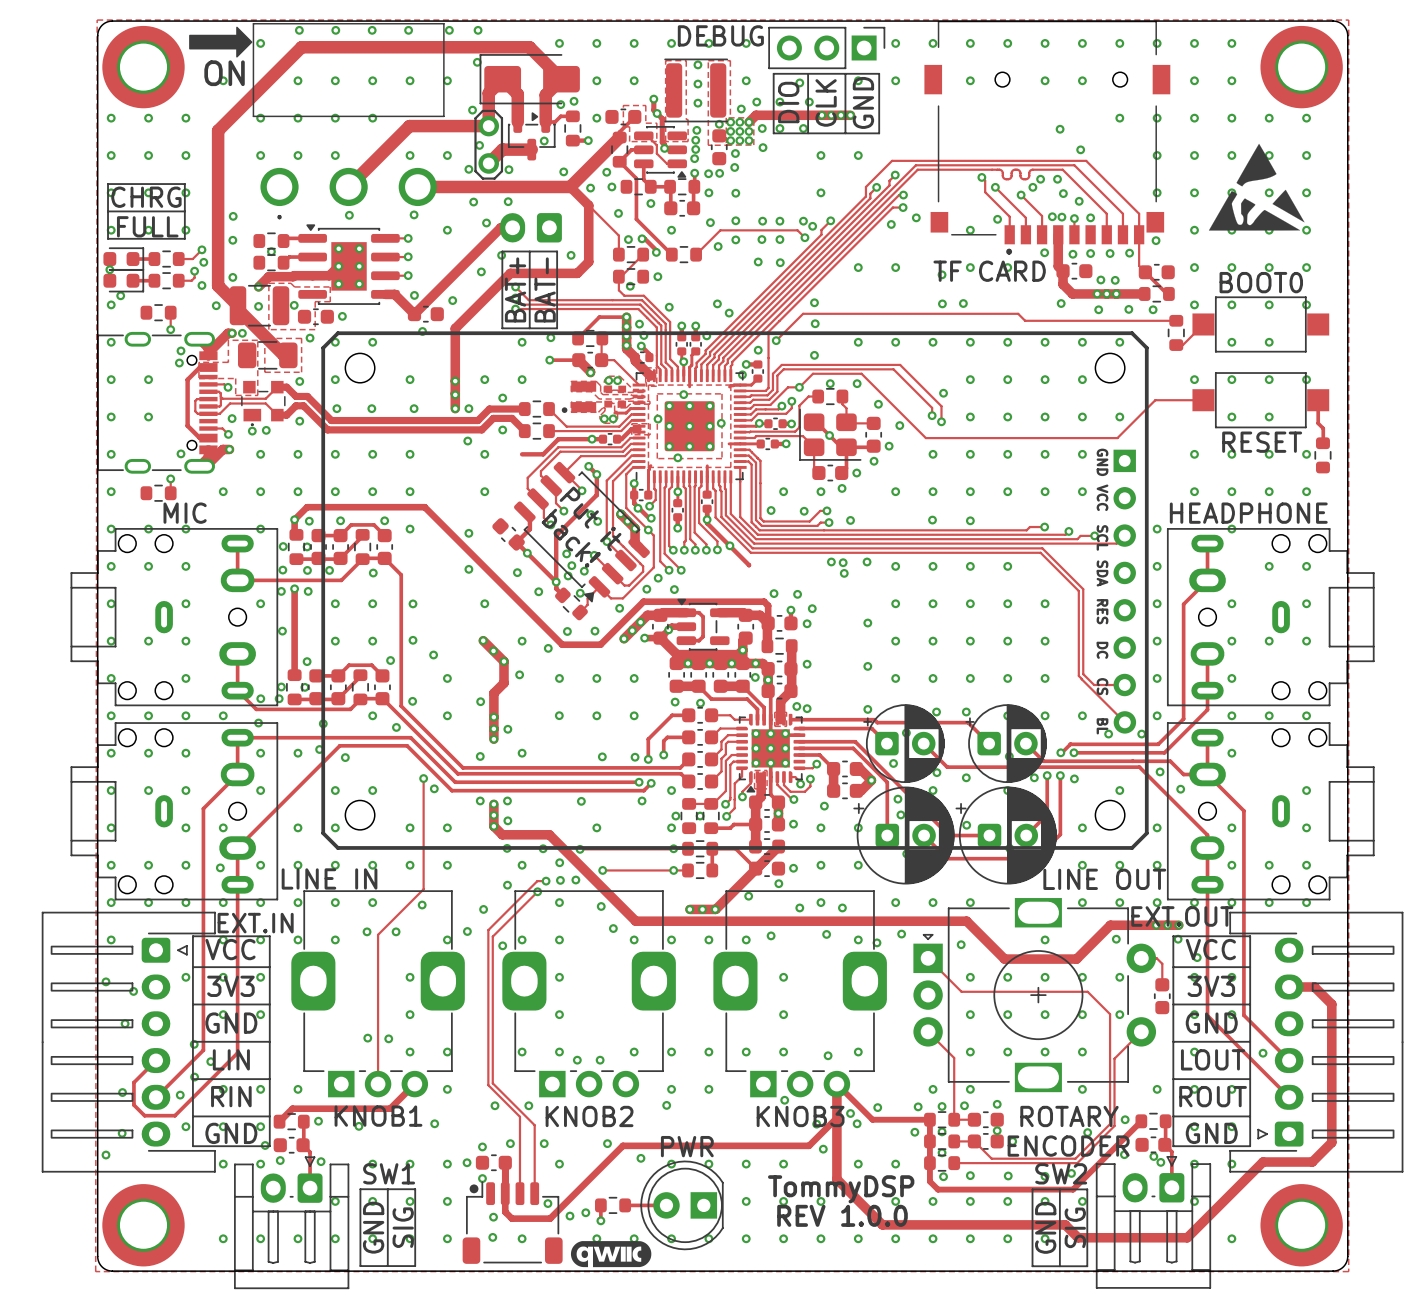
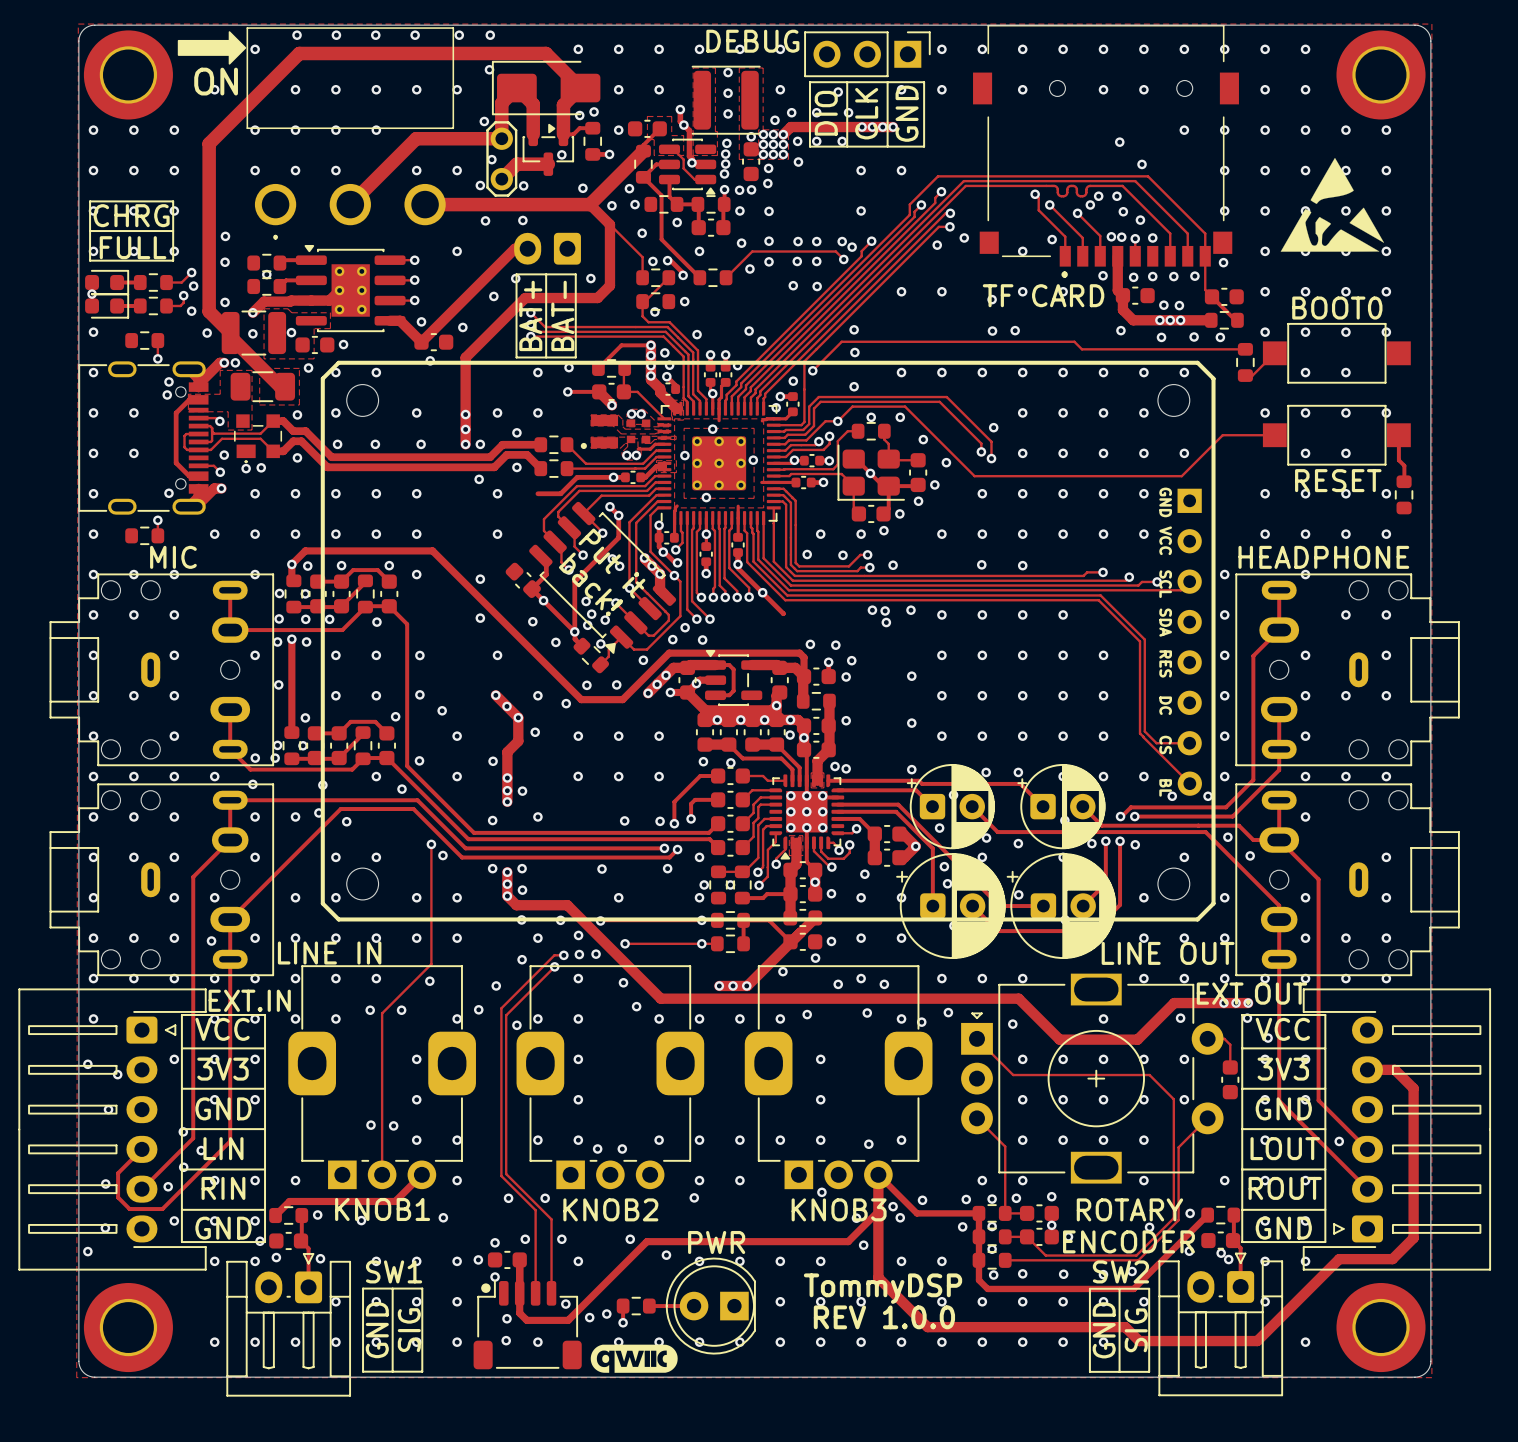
via: (414, 214) -> none
via: (349, 215) -> none
via: (486, 223) -> none
via: (120, 295) -> none

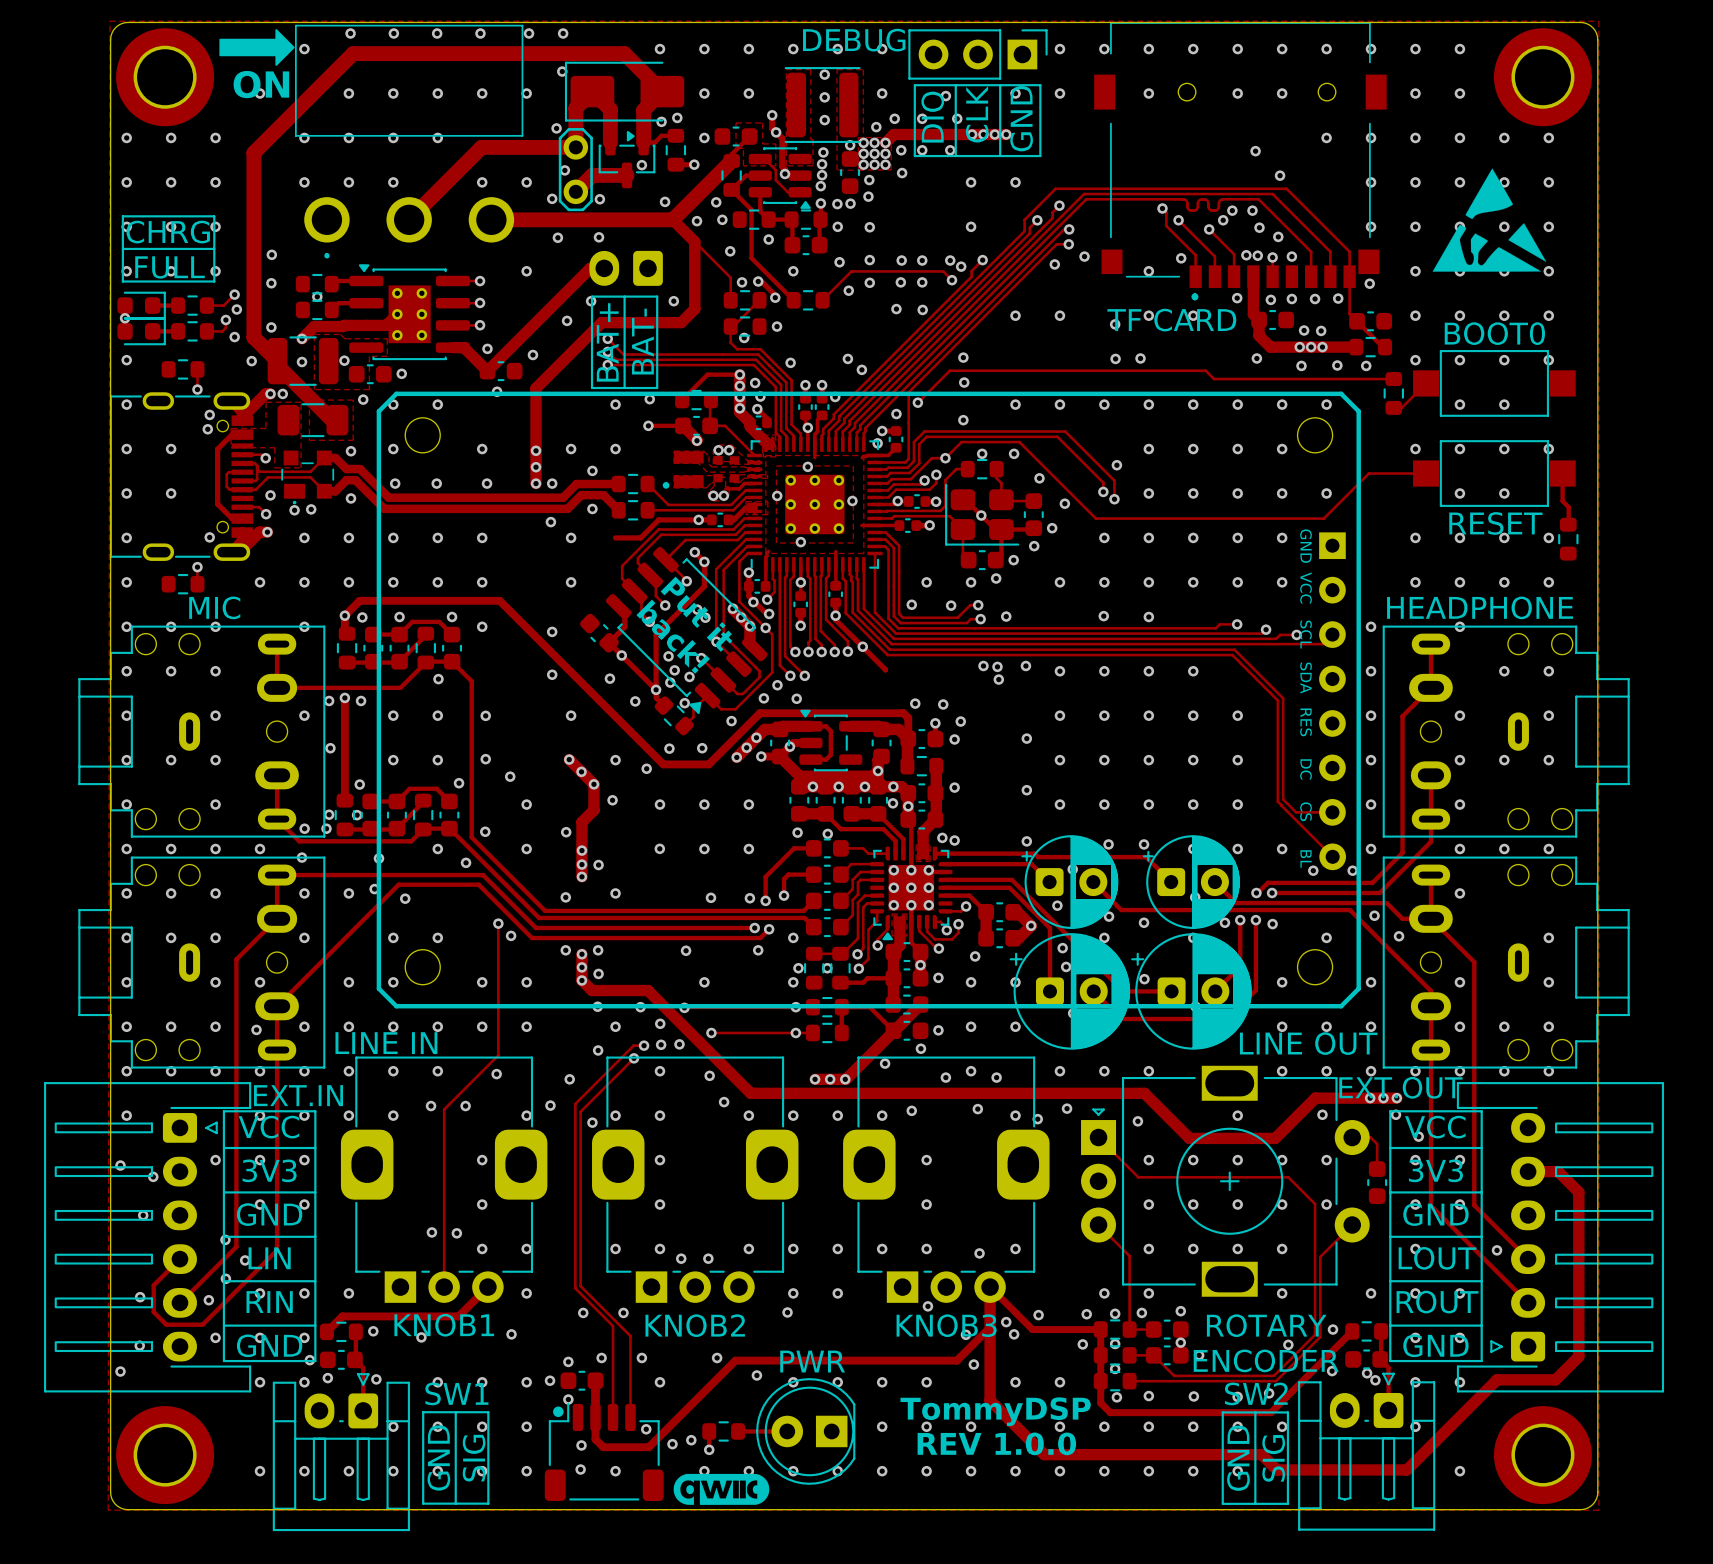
via: (279, 593) -> none
via: (305, 593) -> none
via: (279, 618) -> none
via: (305, 619) -> none
via: (329, 619) -> none

